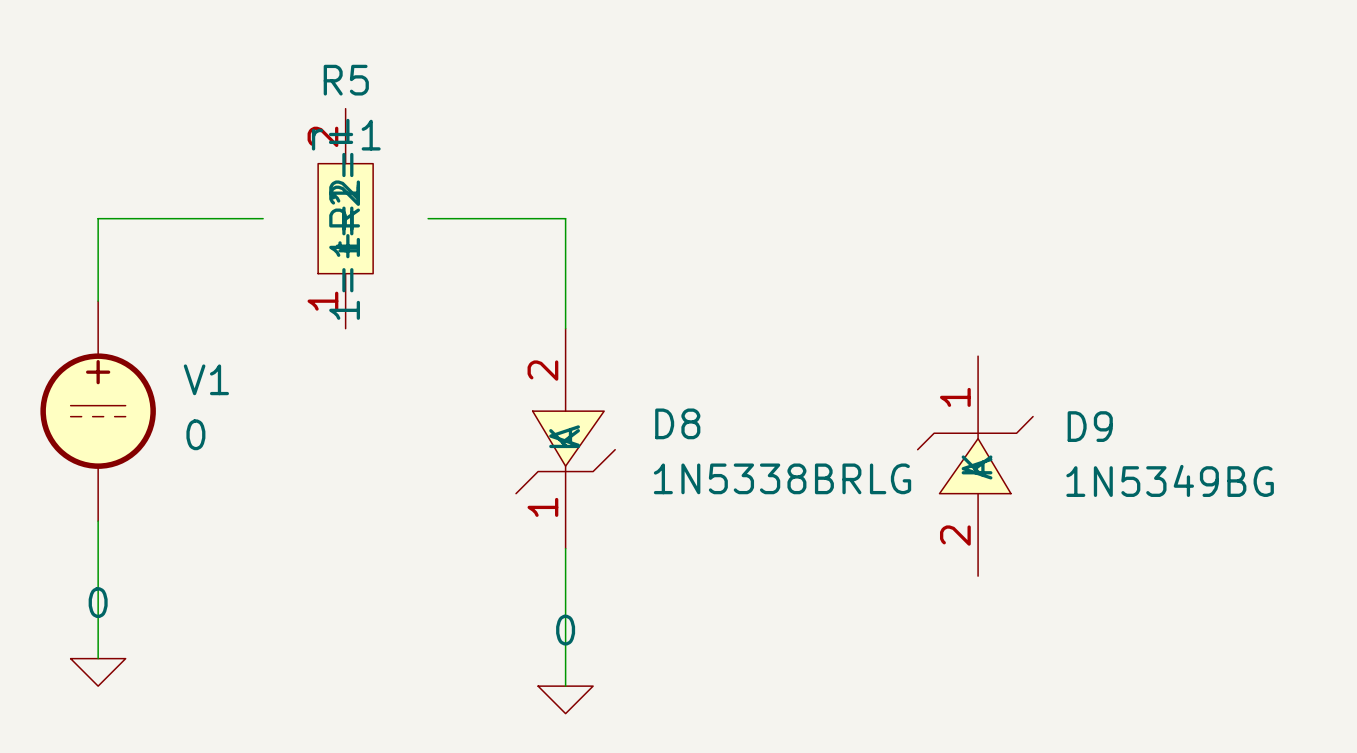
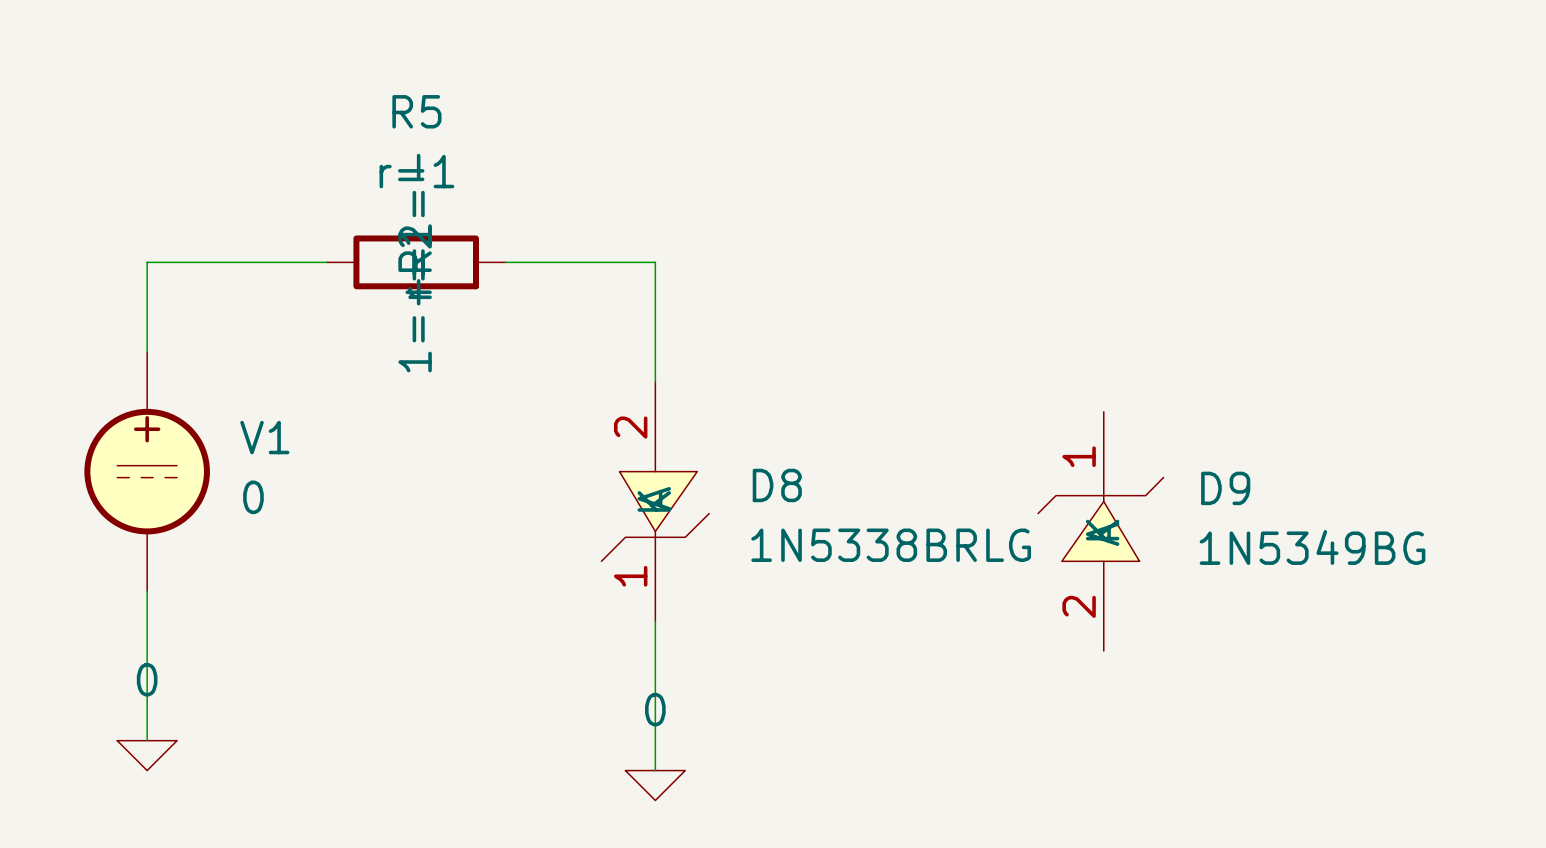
R5 symbol: [318, 108, 374, 329] -> [326, 235, 506, 290]

